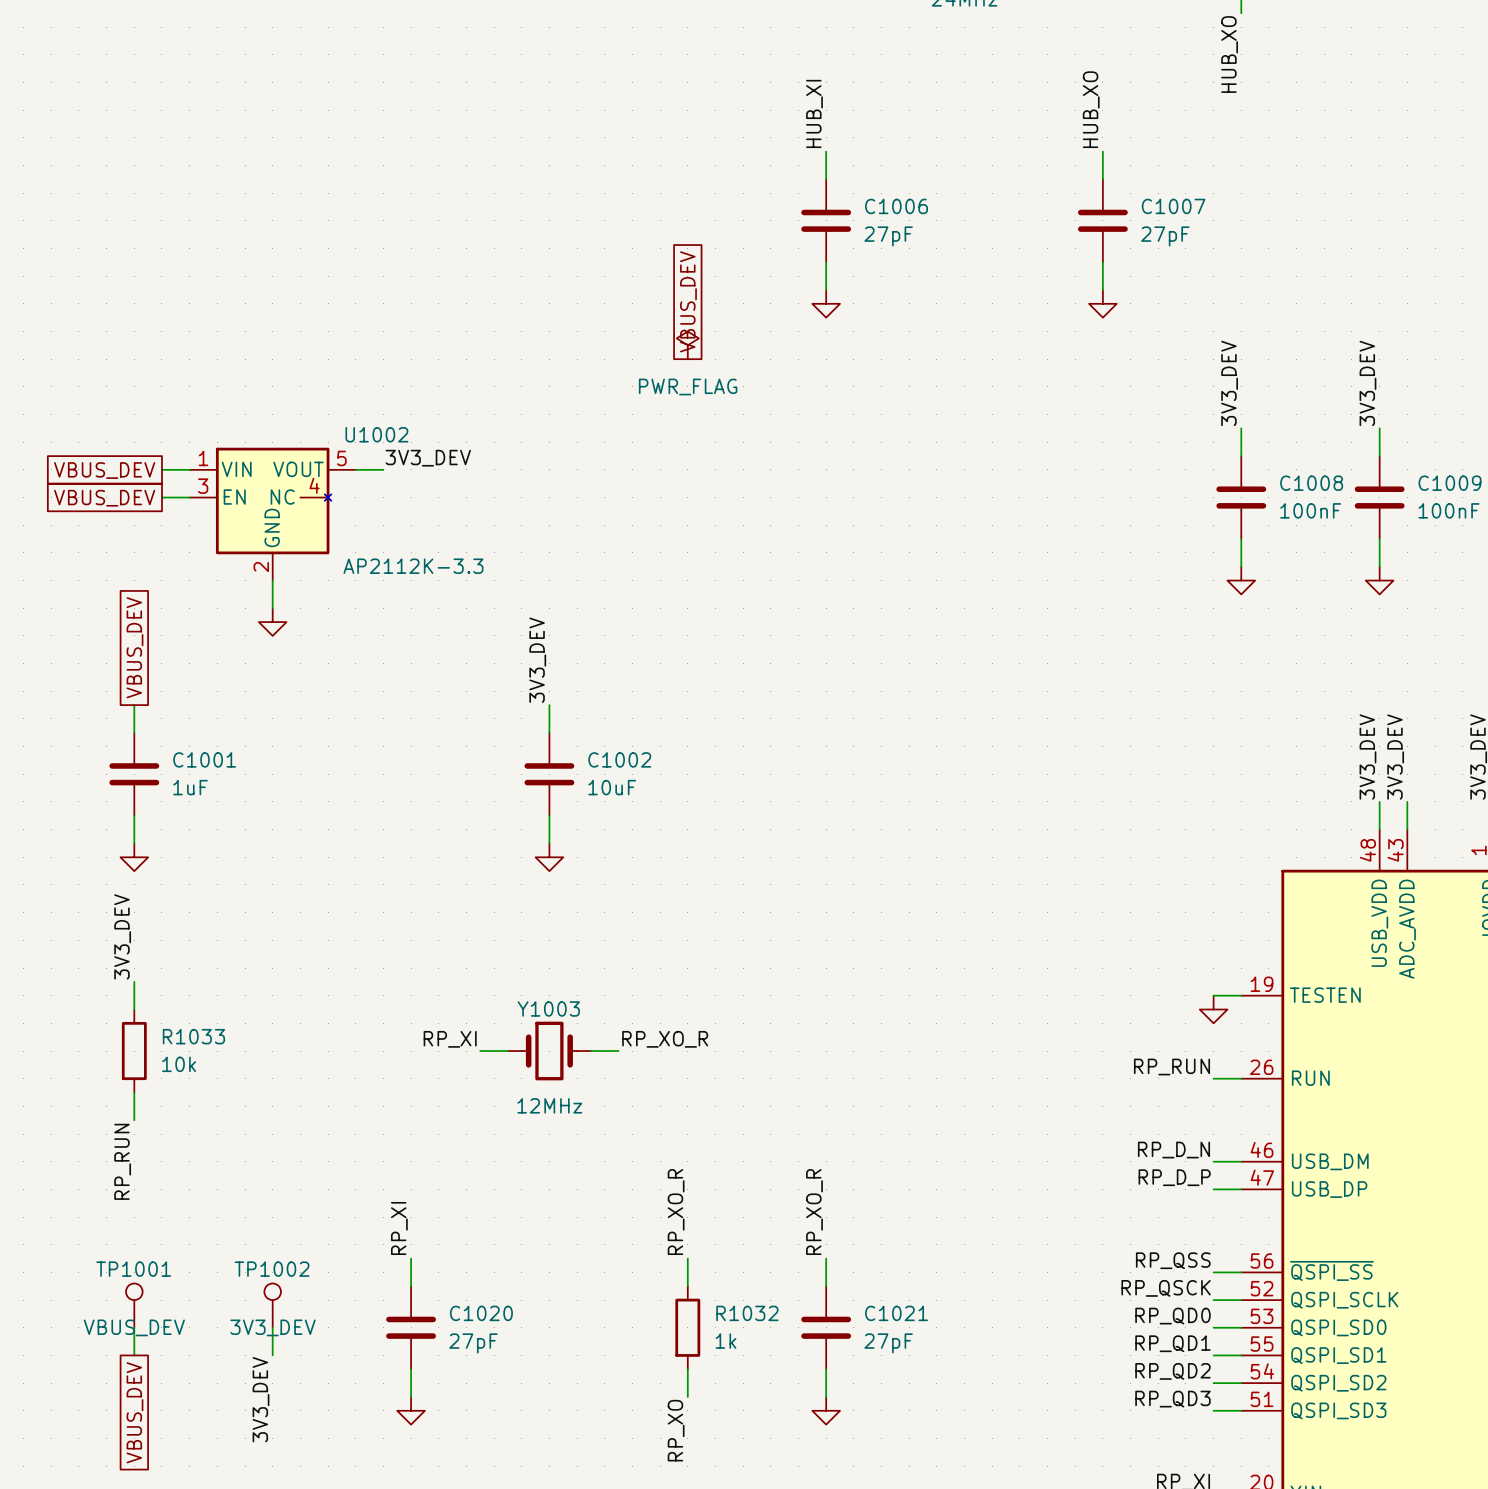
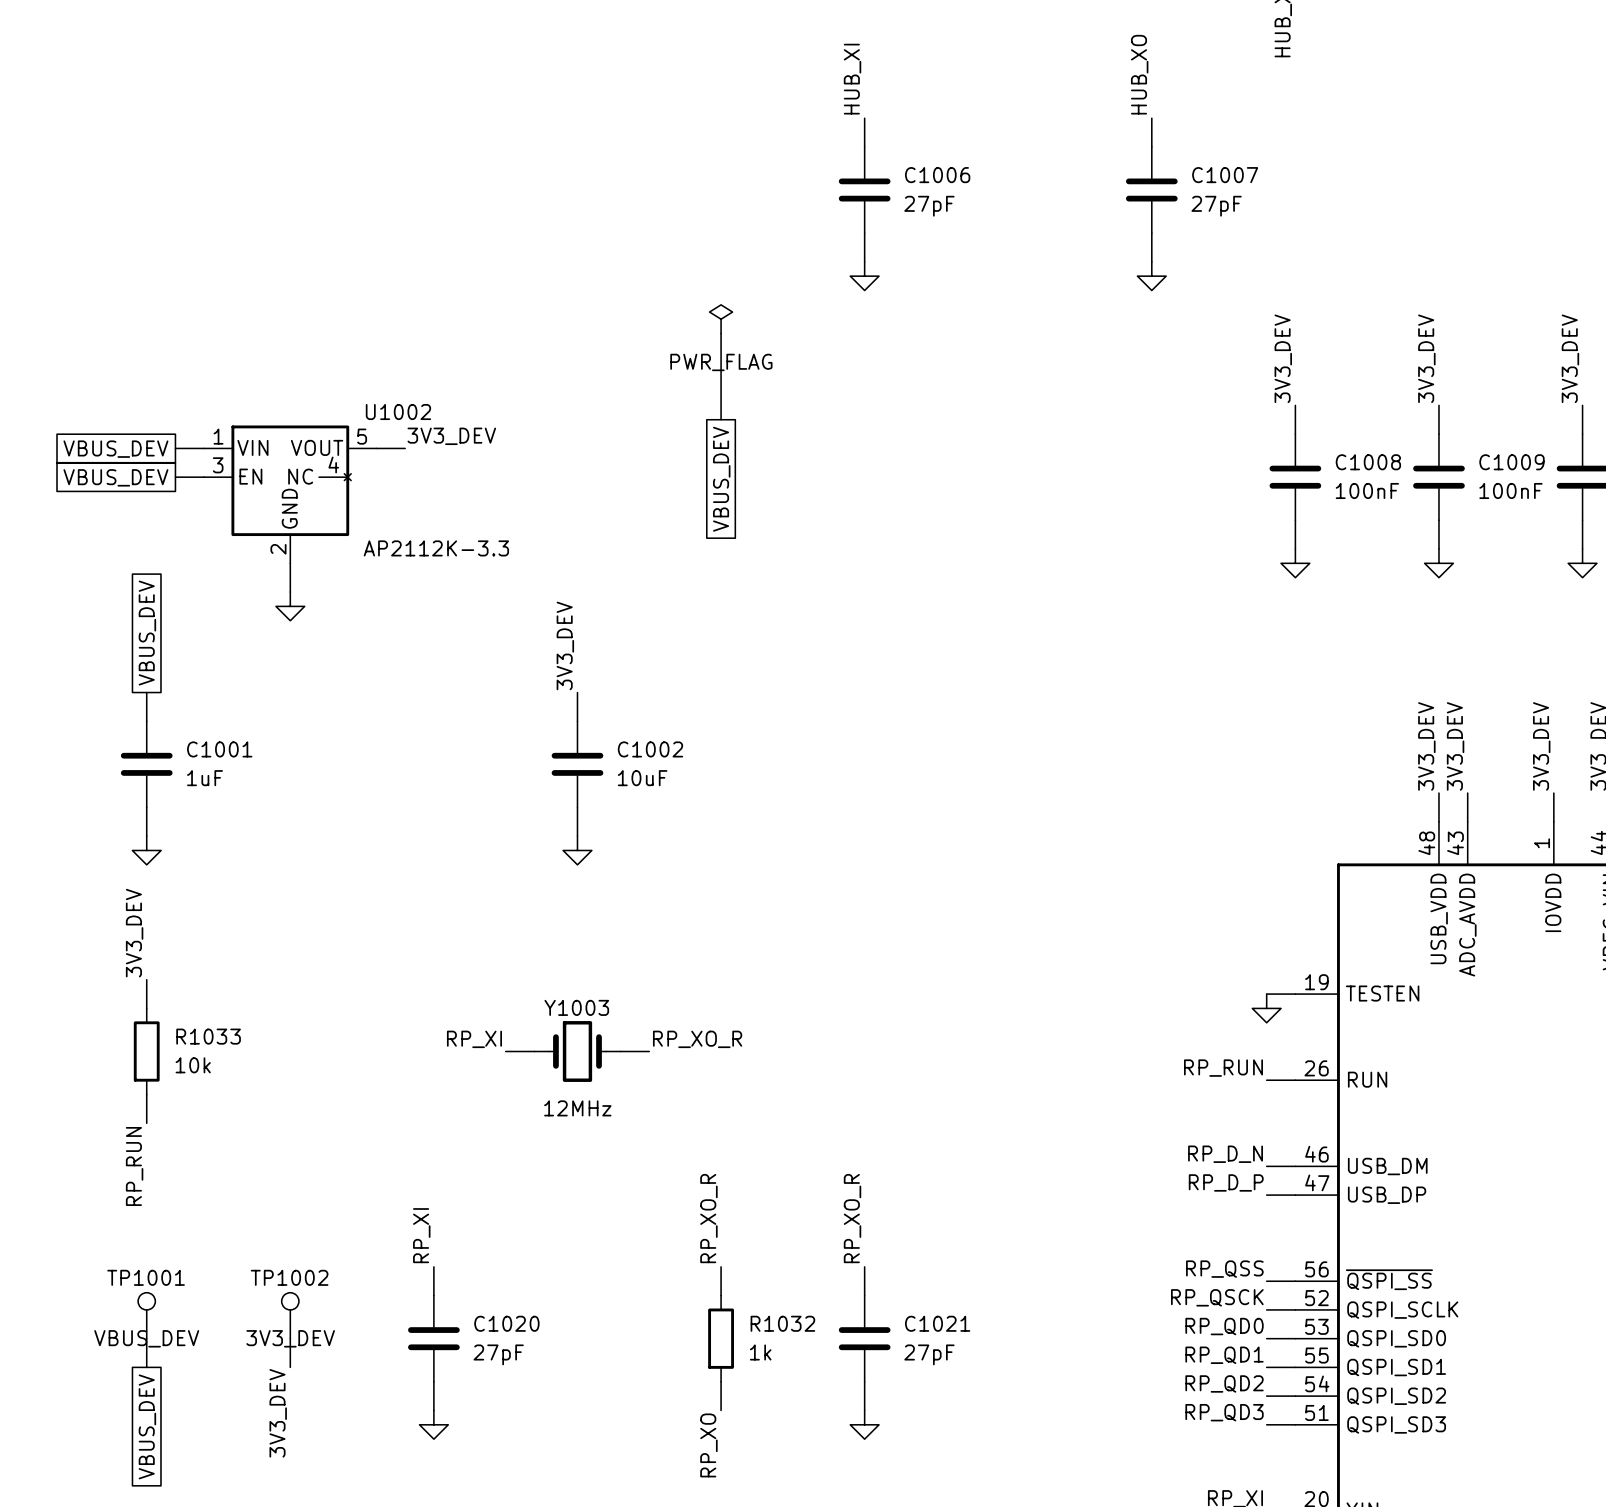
global label rotation: 0° (688, 301) -> 180° (721, 479)
global label position: VBUS_DEV (688, 301) -> VBUS_DEV (721, 479)
wire: none -> (721, 333) (721, 419)

